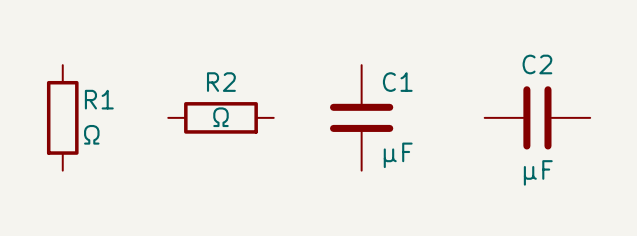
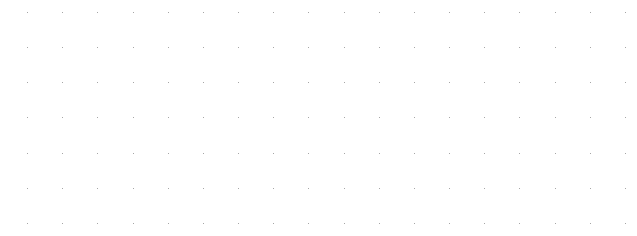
R1: Ω (62, 117) -> none
R2: Ω (220, 117) -> none
C1: μF (361, 117) -> none
C2: μF (537, 117) -> none

